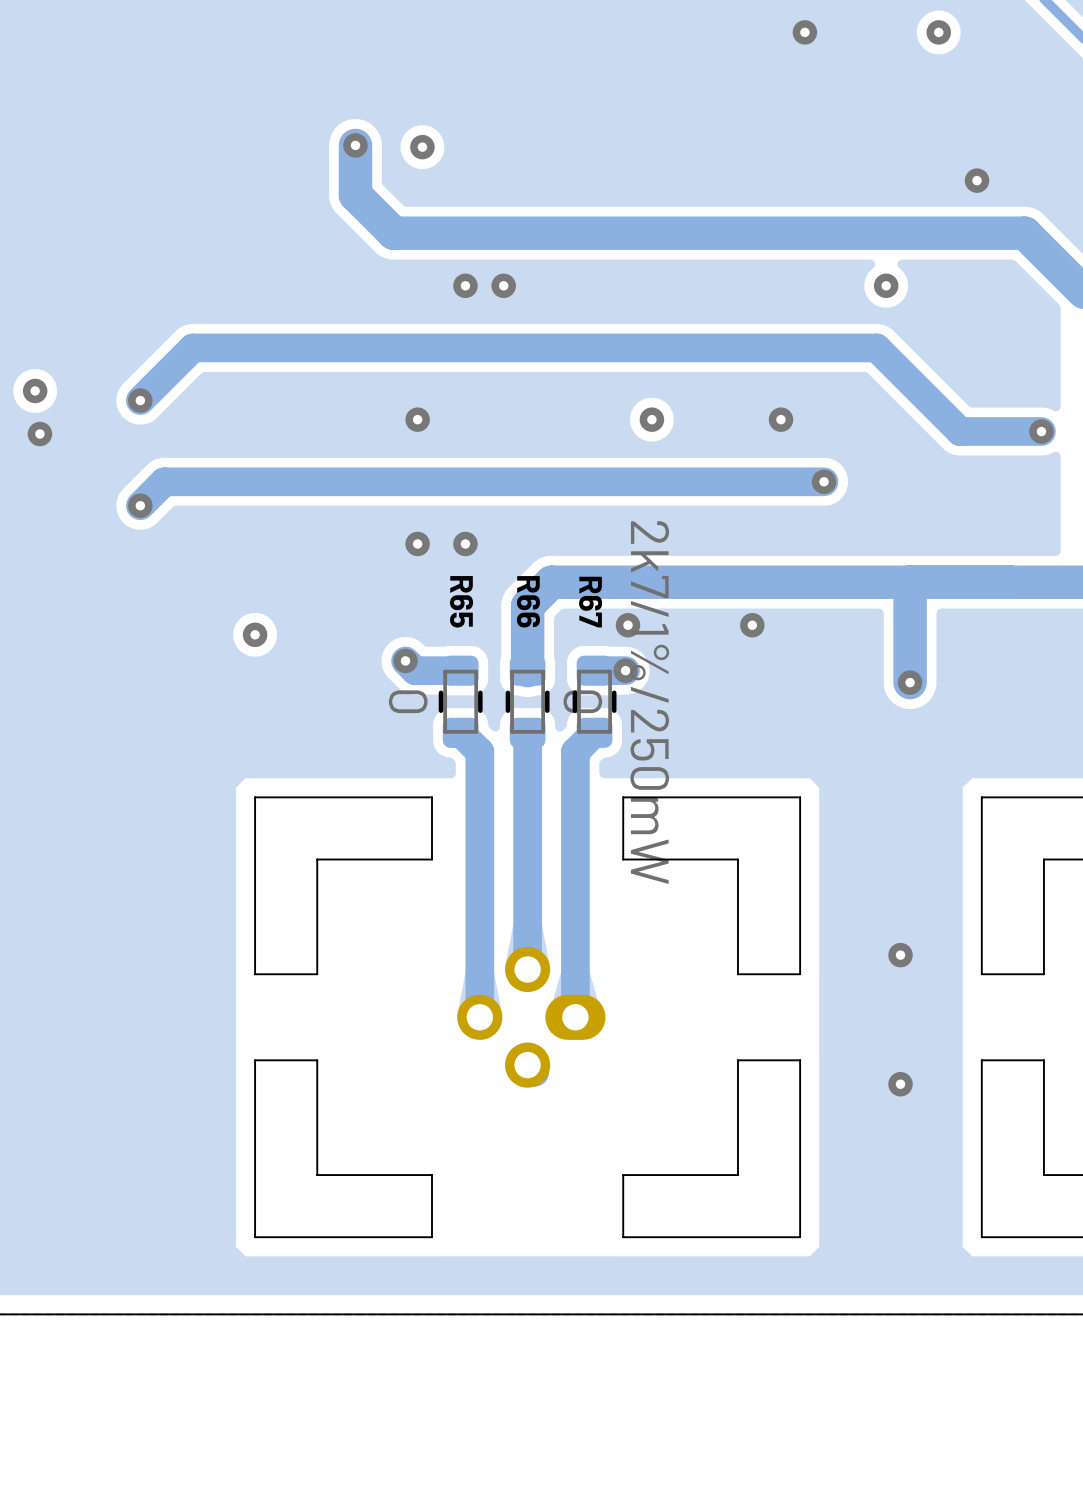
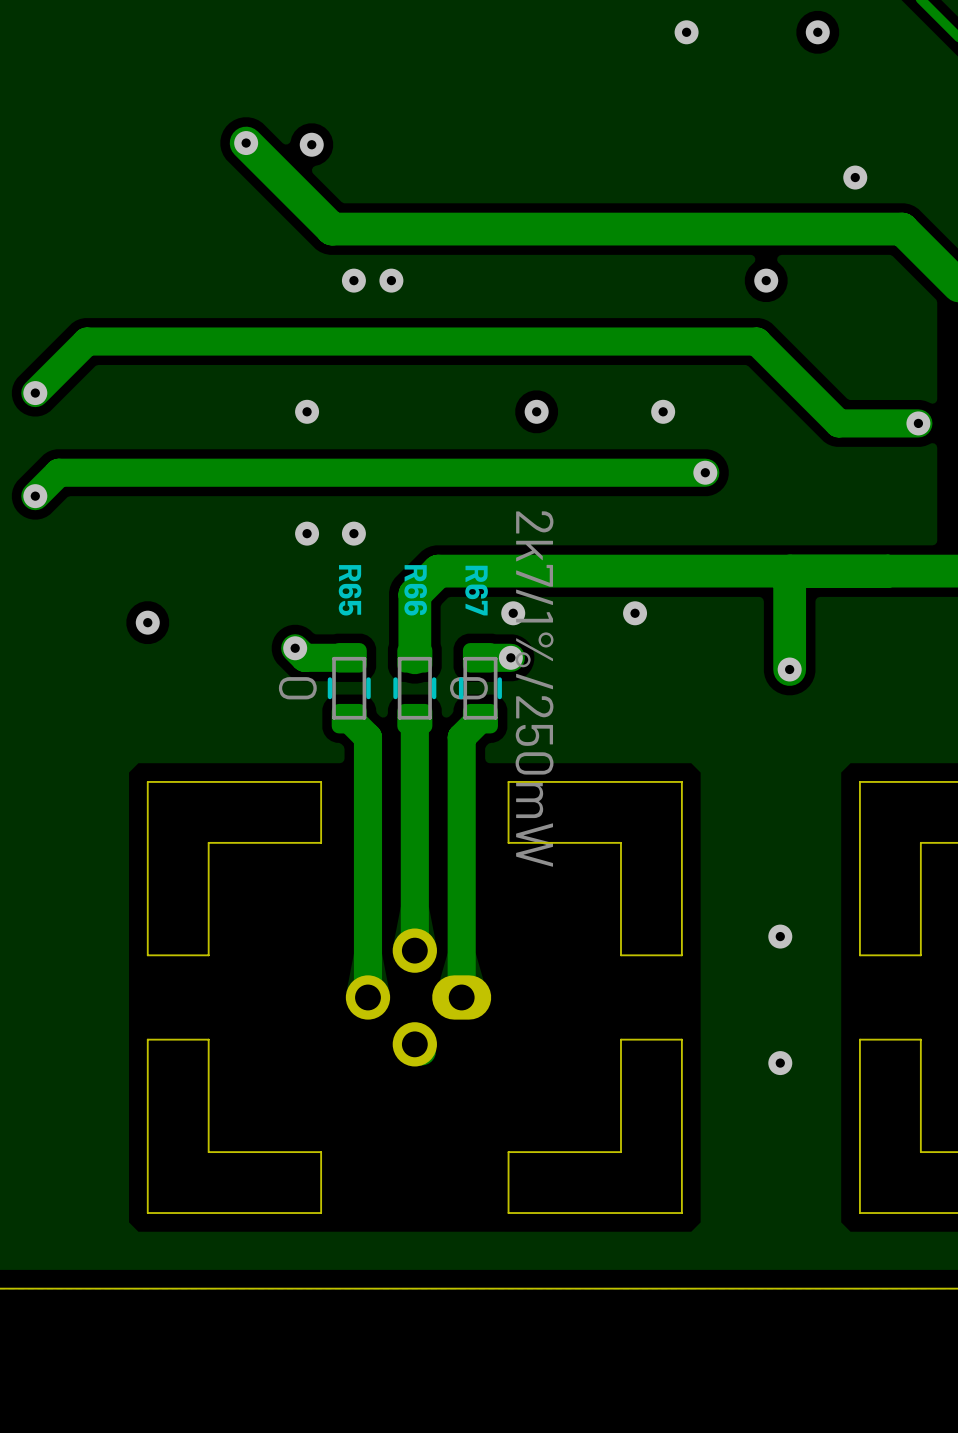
track: (355, 145) (355, 194) (393, 233) (443, 233) -> (246, 143) (332, 229)

